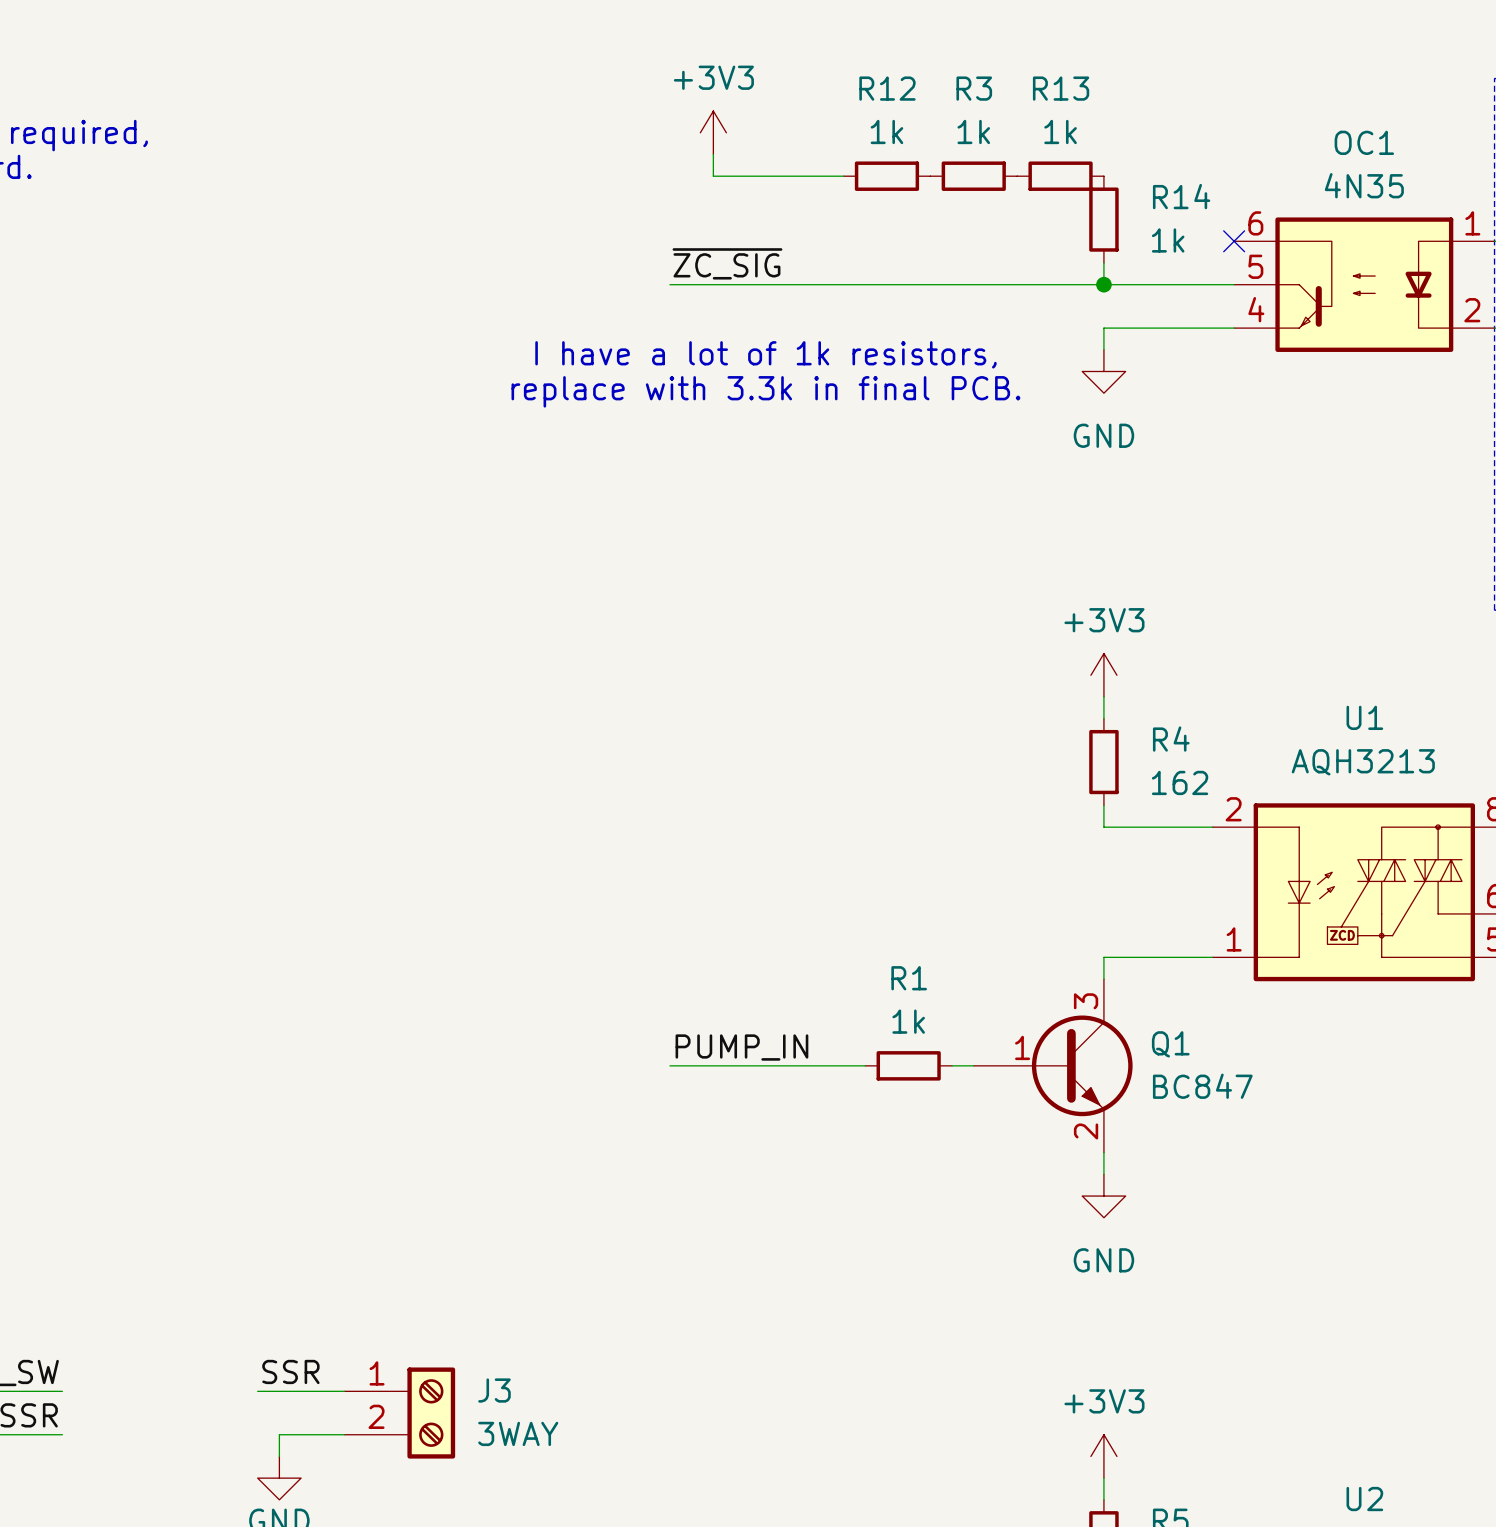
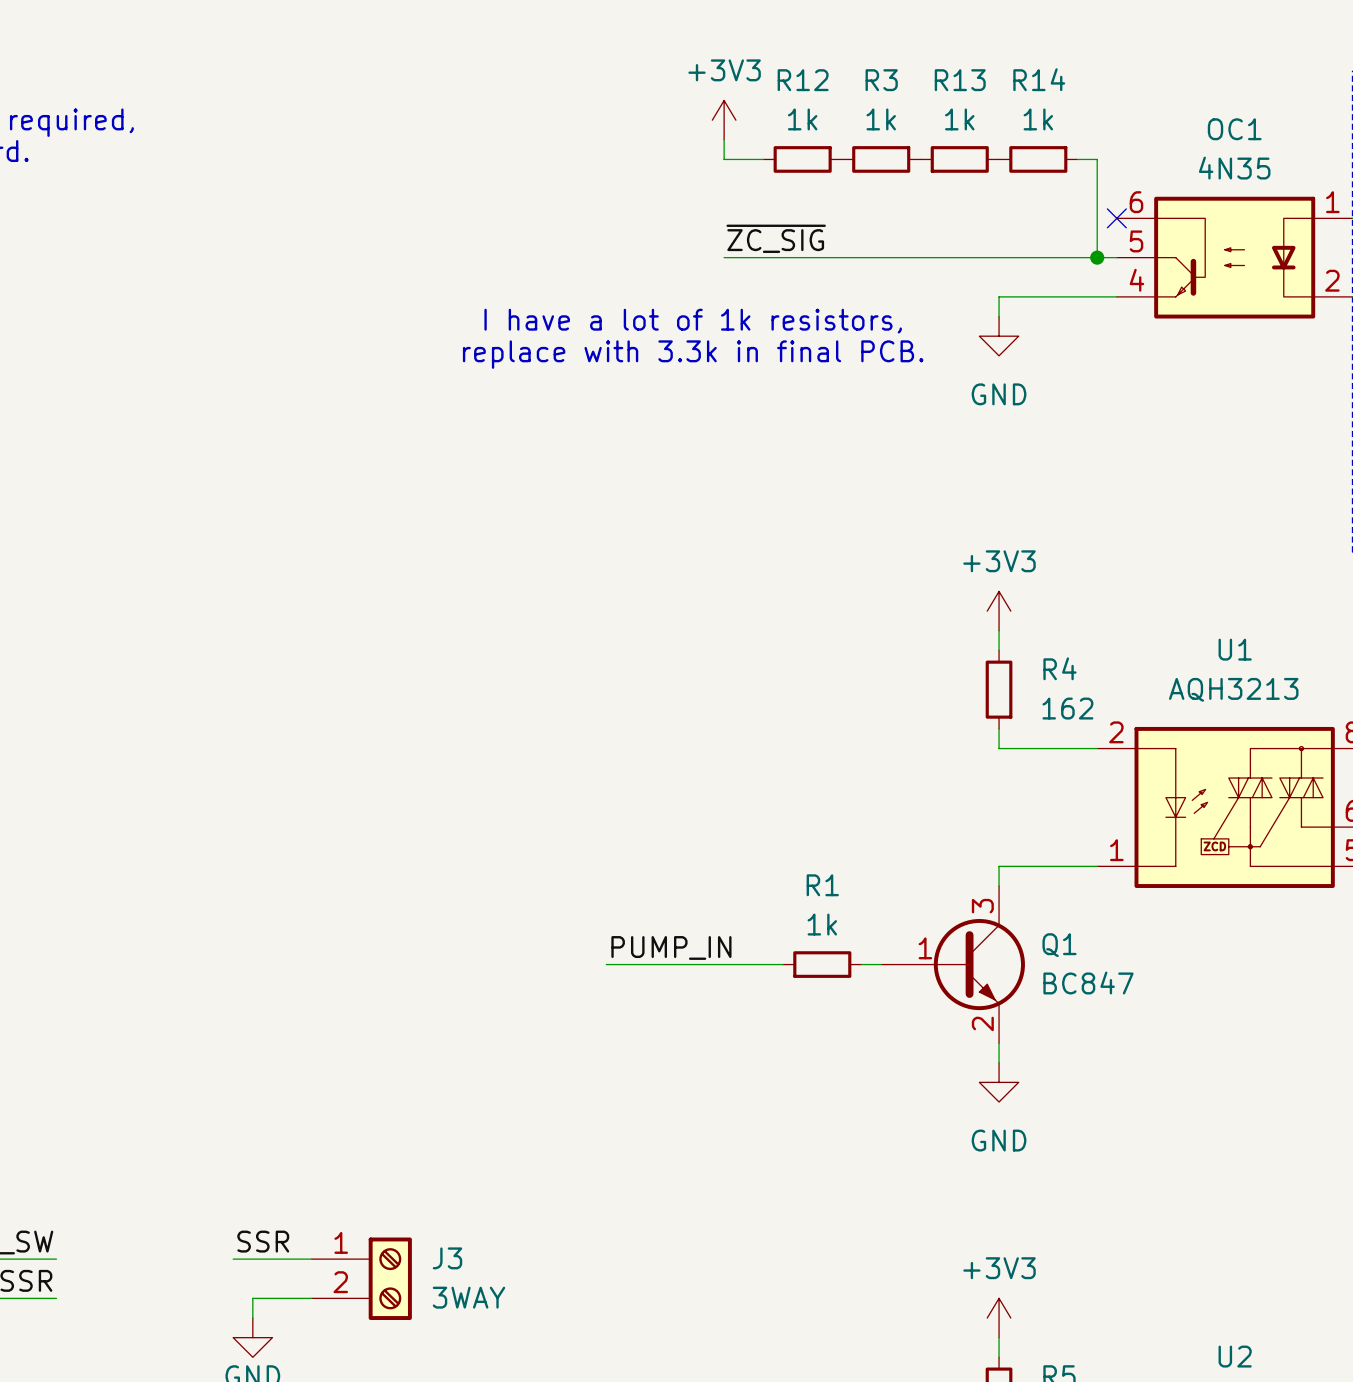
power symbol position: +3V3 (713, 132) -> +3V3 (724, 120)
wire: (713, 154) (713, 176) (800, 176) -> (724, 139) (724, 159)
wire: none -> (1077, 159) (1097, 159) (1097, 257)
R14 name position: R14 (1181, 196) -> R14 (1039, 79)
R14 rotation: 0° (1103, 219) -> 90° clockwise (1038, 159)
R14 position: (1103, 219) -> (1038, 159)
R14 value position: 1k (1168, 240) -> 1k (1038, 119)
wire: (1103, 262) (1103, 284) -> none
label position: ~{ZC_SIG} (727, 263) -> ~{ZC_SIG} (776, 238)
wire: (669, 284) (800, 284) -> none
junction: (1103, 284) -> none
junction: none -> (1097, 257)

